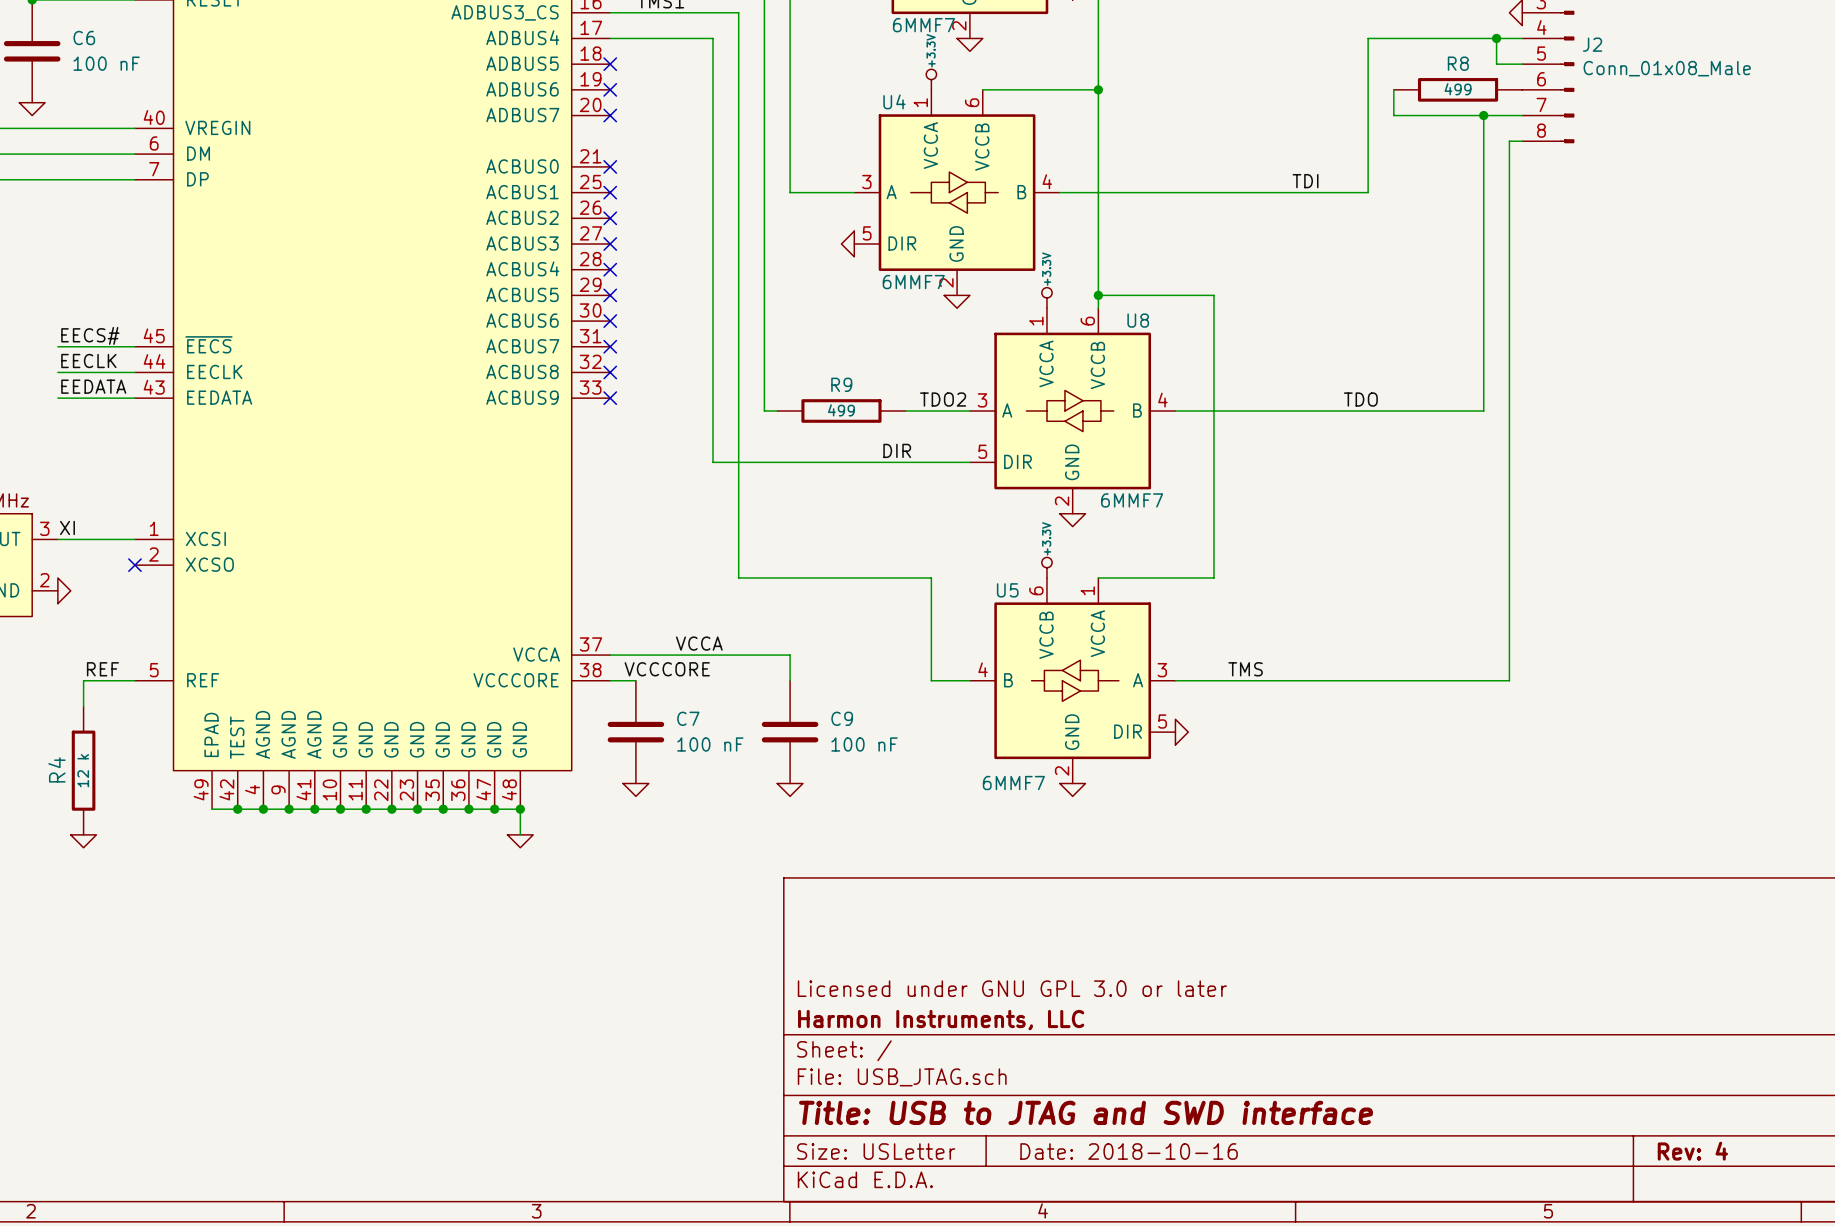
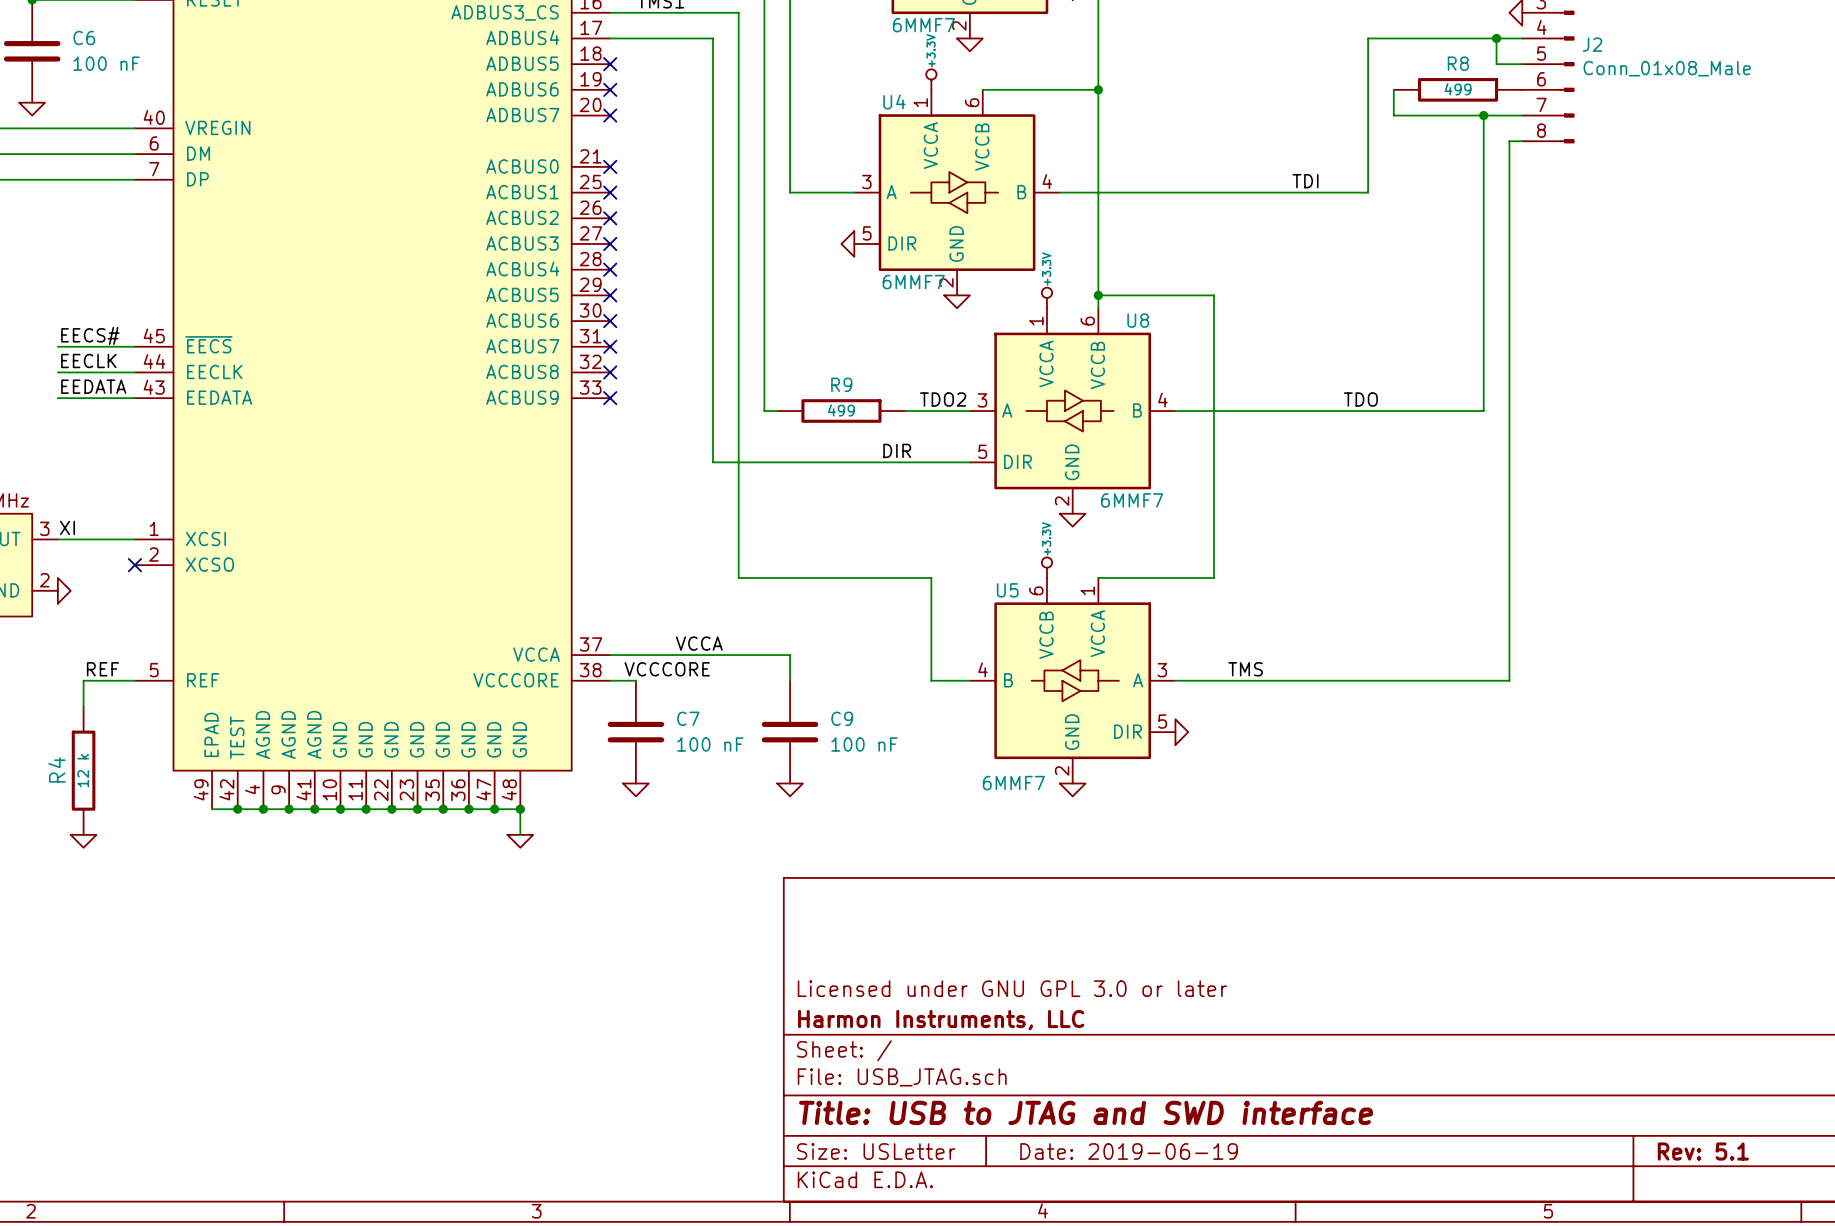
title block: Date: 2018-10-16 (1129, 1151) -> Date: 2019-06-19 (1129, 1151)
title block: Rev: 4 (1692, 1151) -> Rev: 5.1 (1703, 1151)

